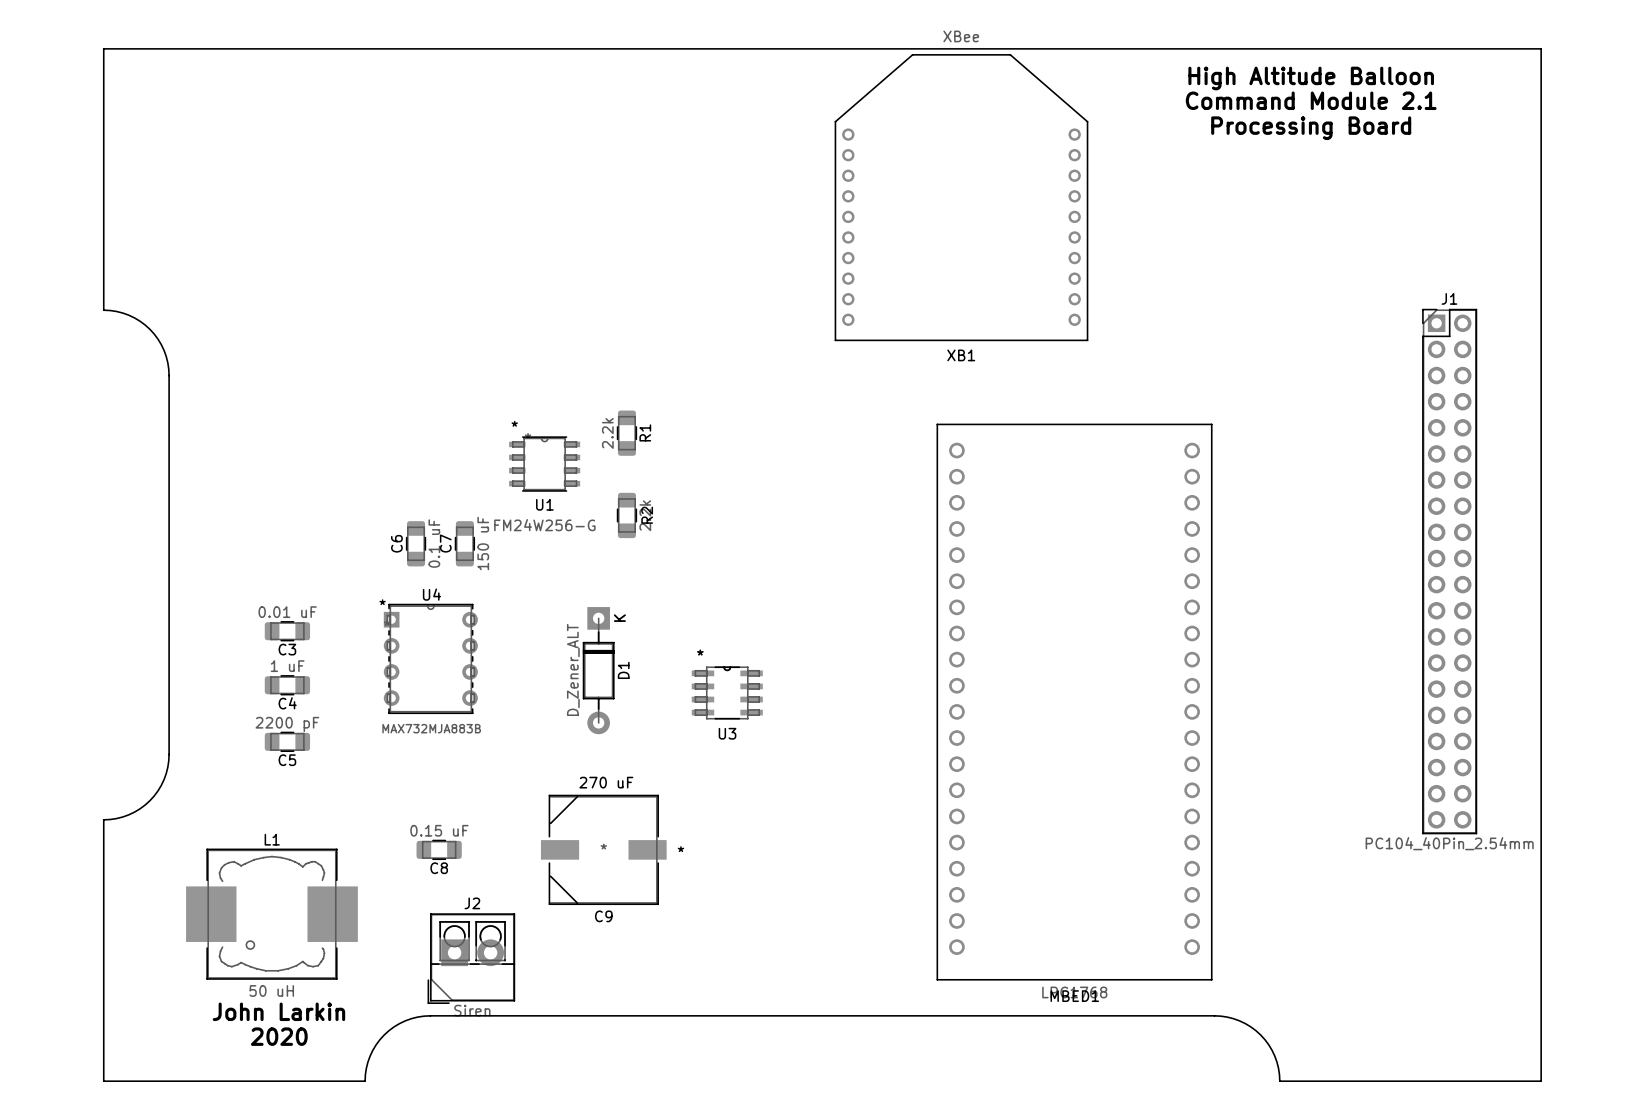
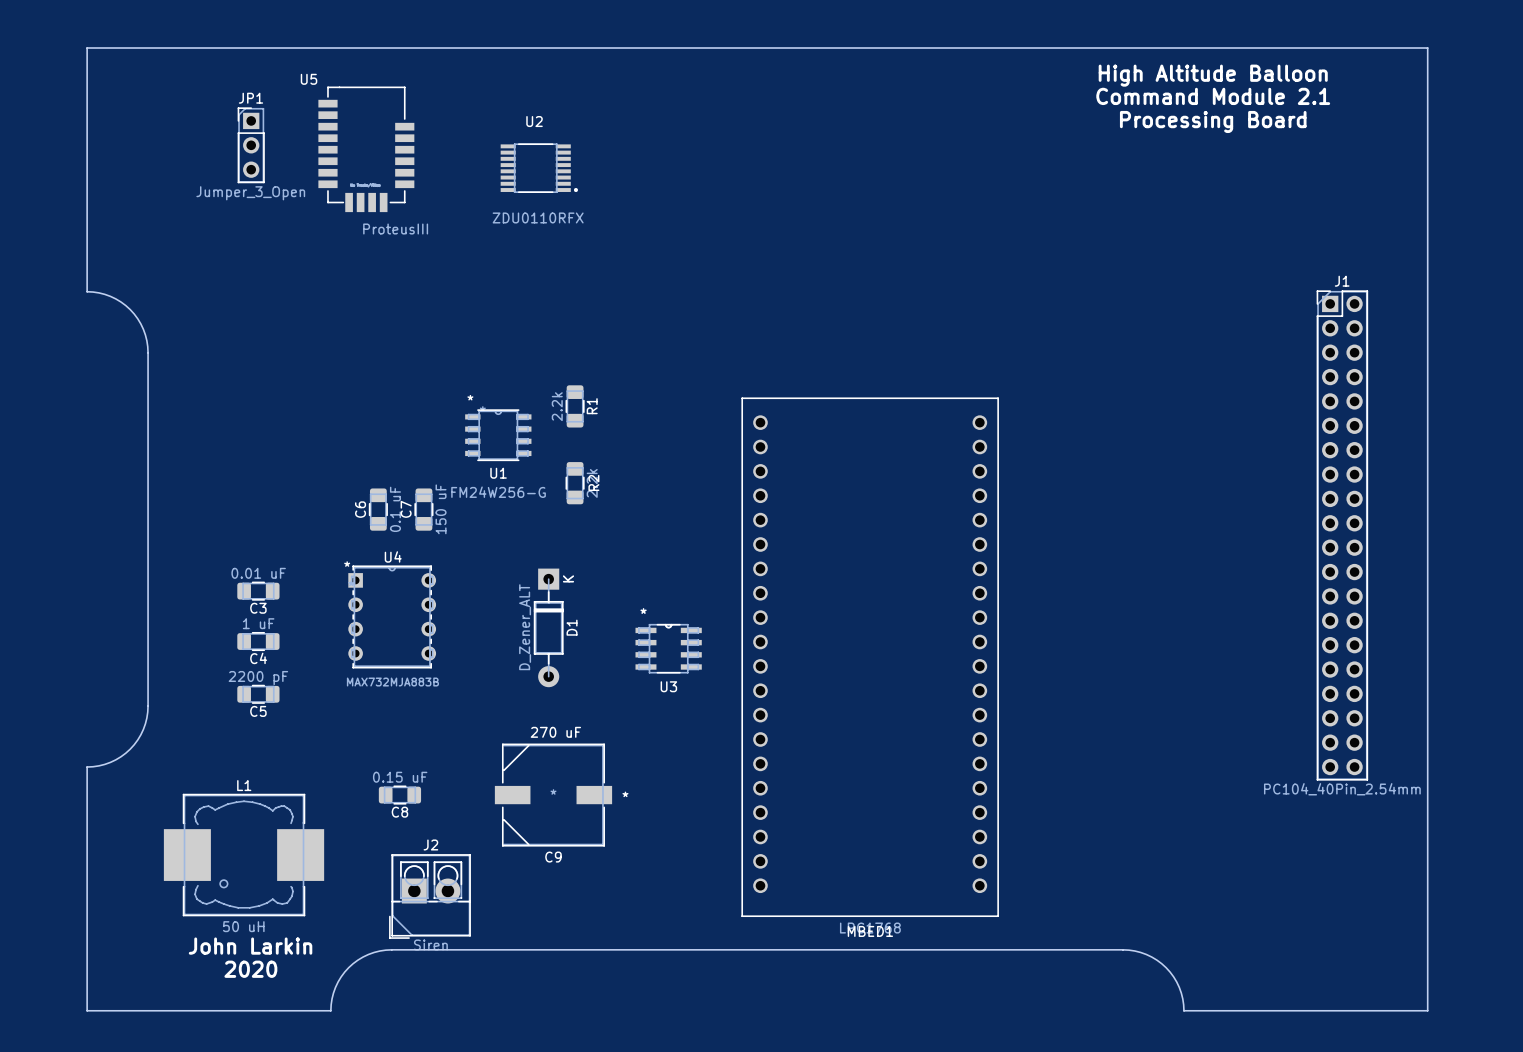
JP1: none -> Jumper_3_Open (251, 145)
U5: none -> ProteusIII (366, 149)
U2: none -> ZDU0110RFX (539, 168)
XB1: XBee (961, 197) -> none
MBED1 position: (1074, 702) -> (870, 657)

